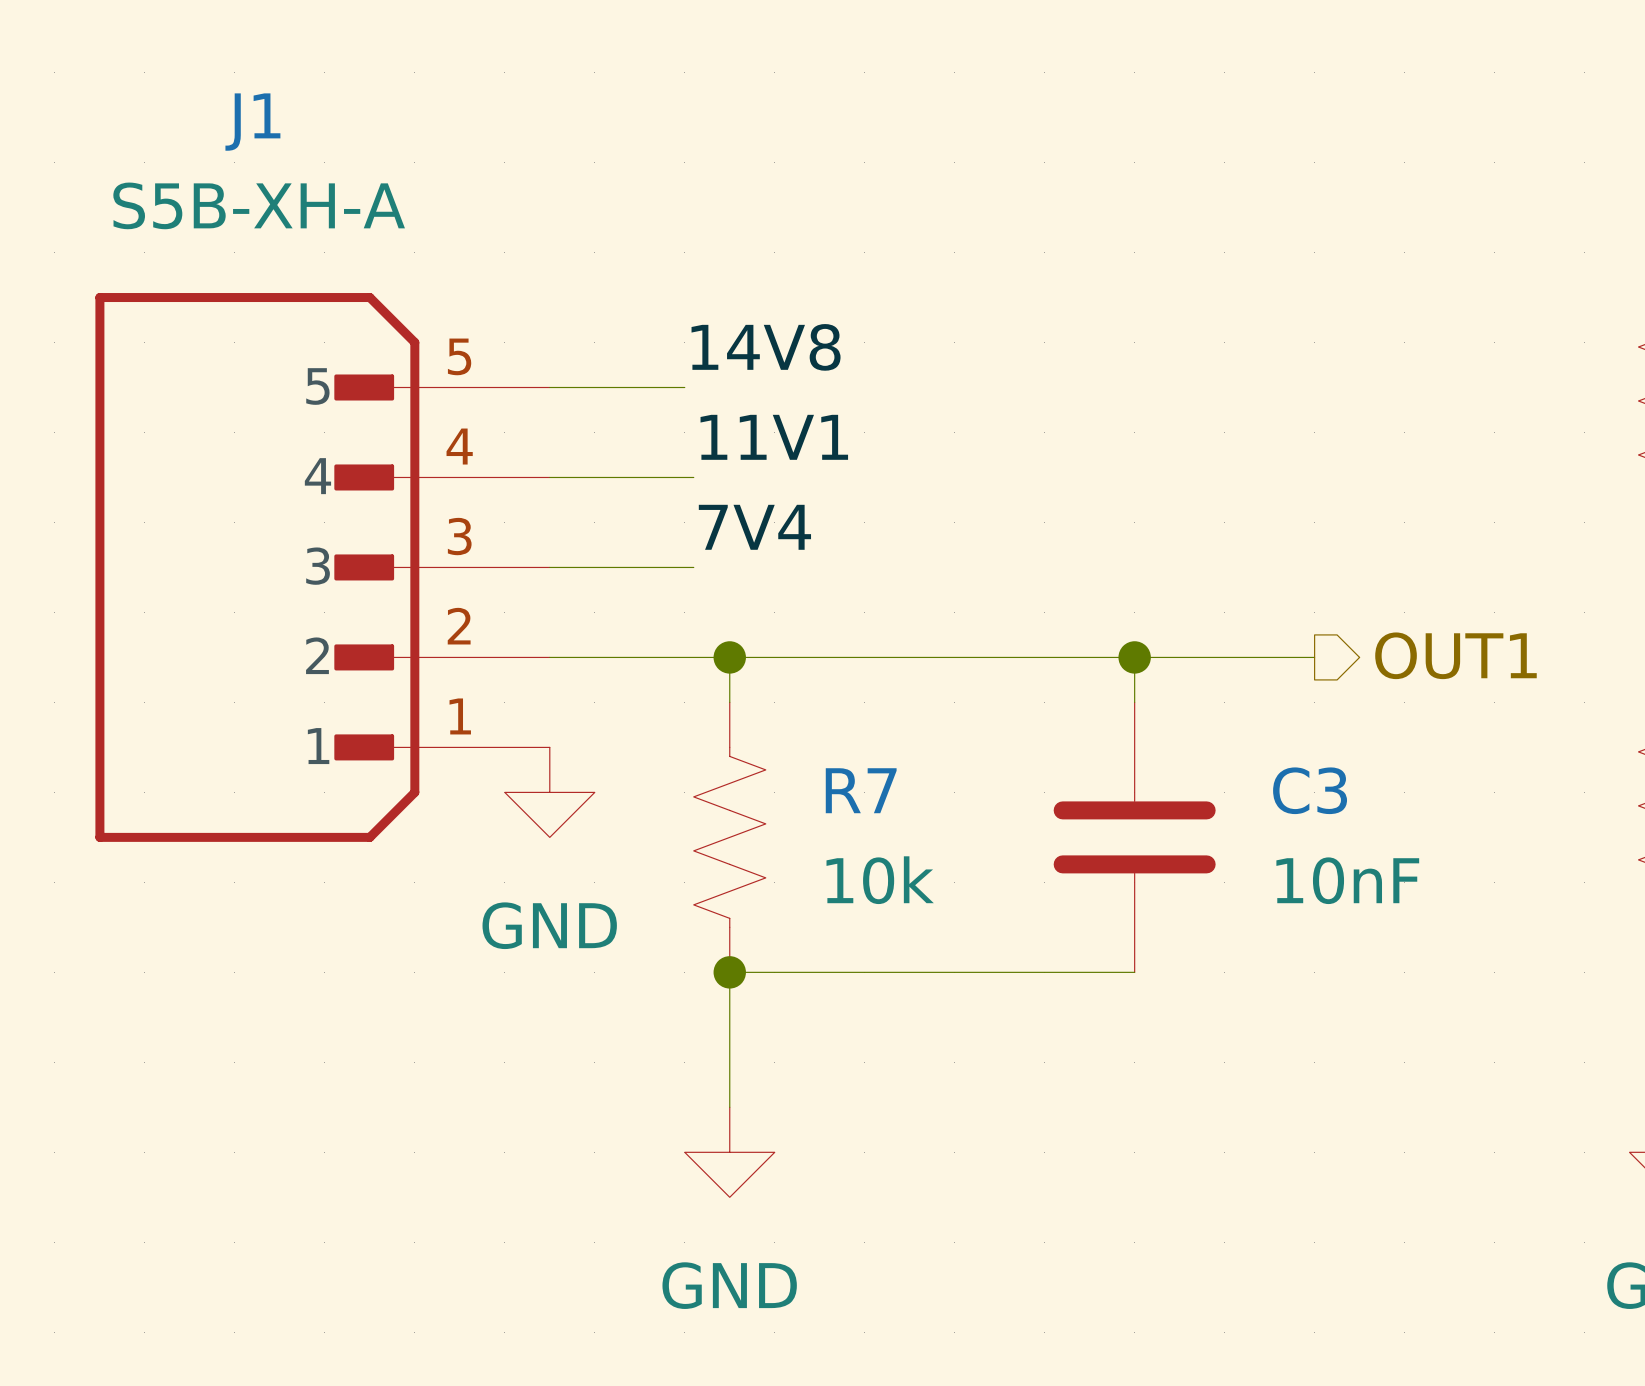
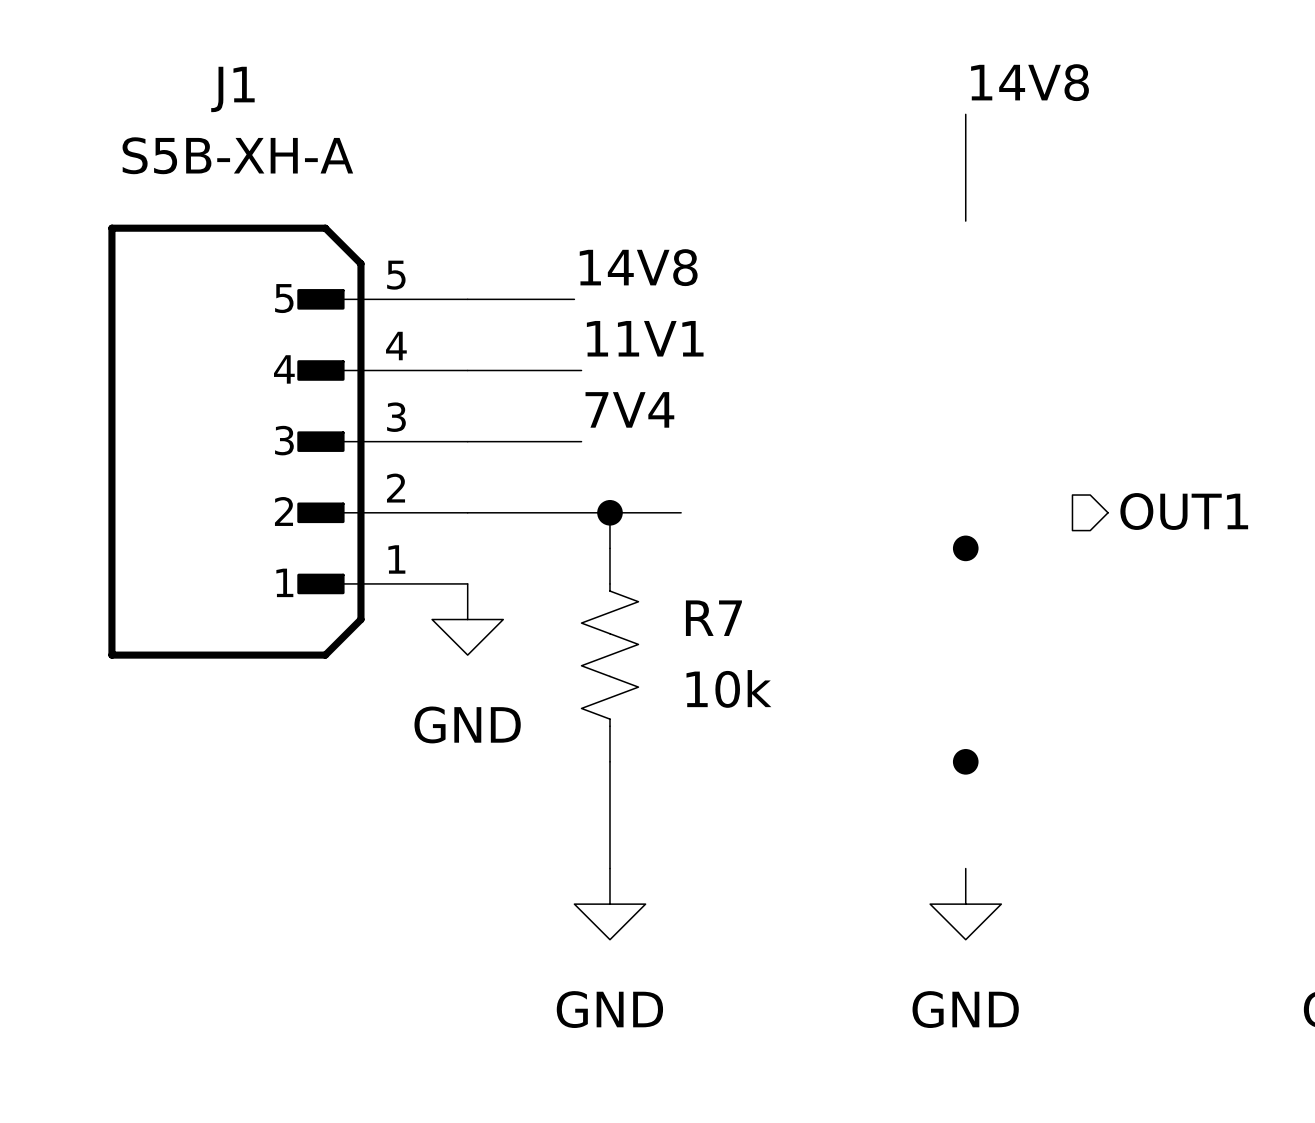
label: none -> 14V8 (1030, 82)
wire: none -> (965, 114) (965, 221)
wire: (819, 657) (1314, 657) -> none
wire: (1134, 657) (1134, 702) -> none
junction position: (1134, 657) -> (965, 548)
C3: 10nF (1134, 837) -> none
wire: (729, 972) (1134, 972) -> none
junction: (729, 972) -> none
junction: none -> (965, 761)
power symbol: none -> GND (965, 904)

